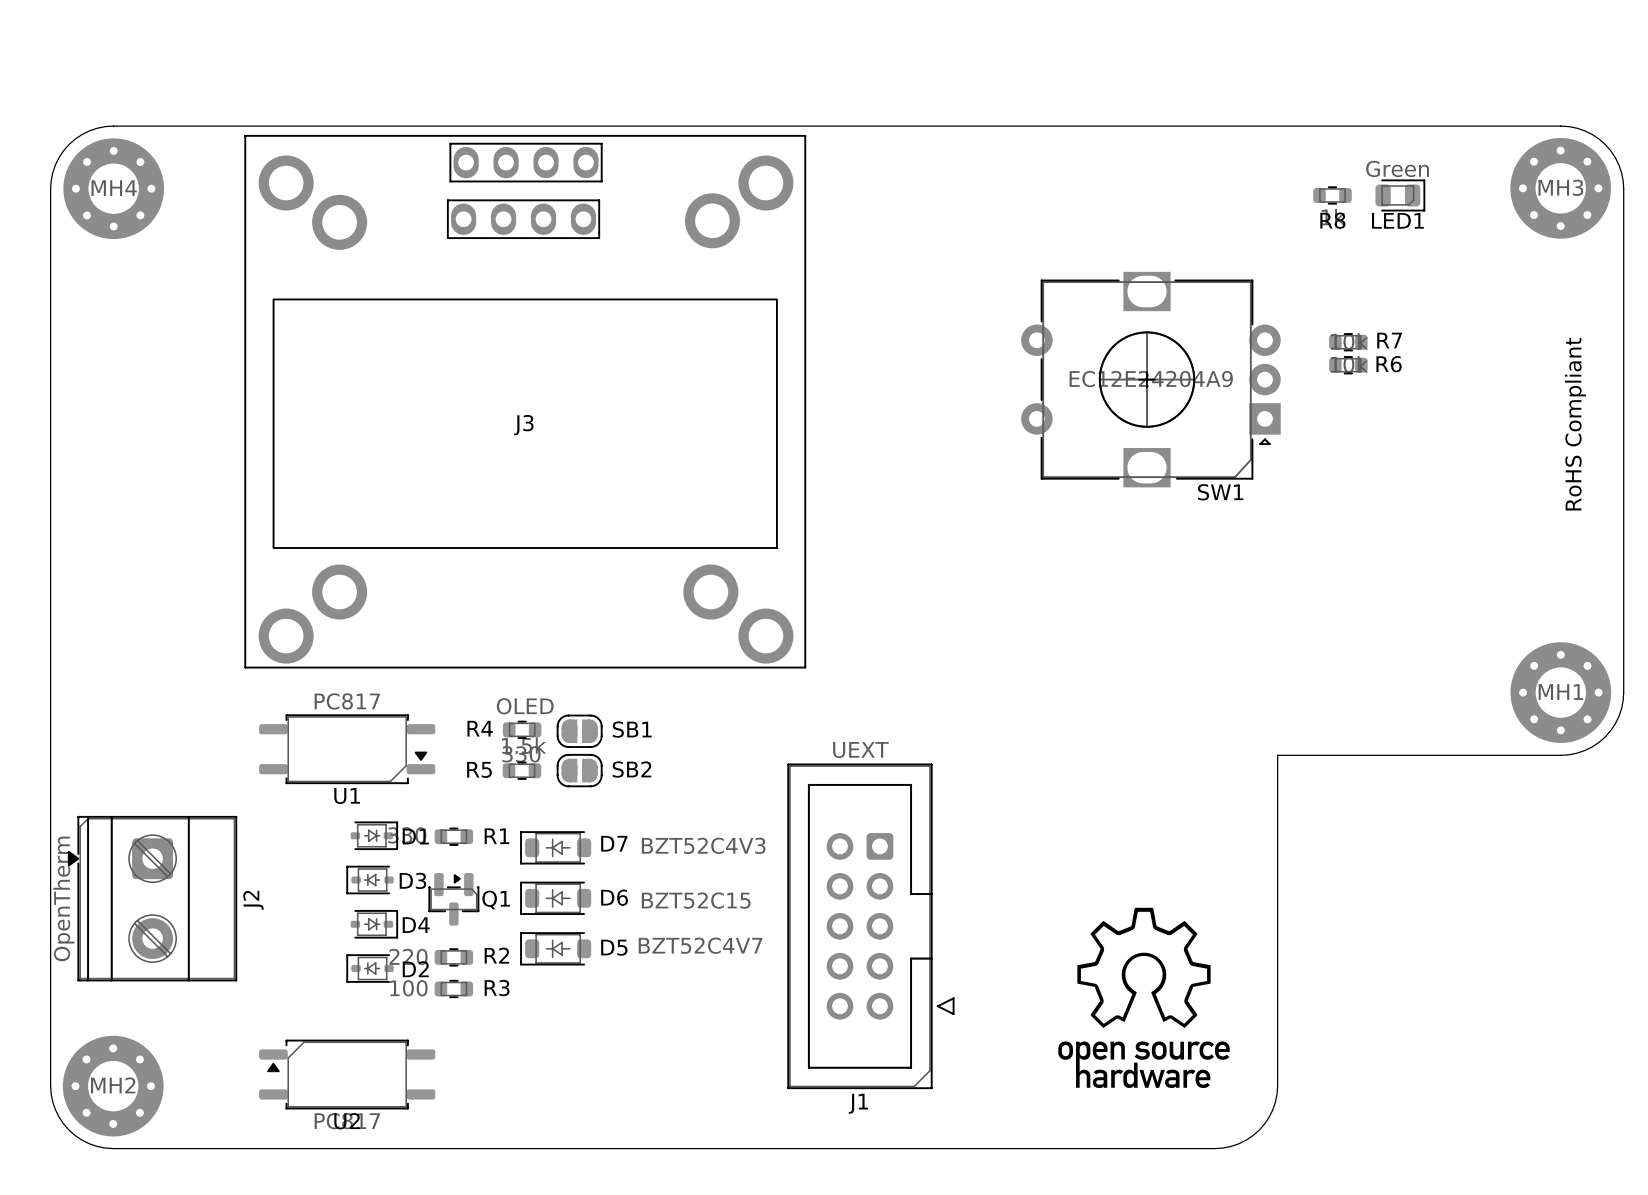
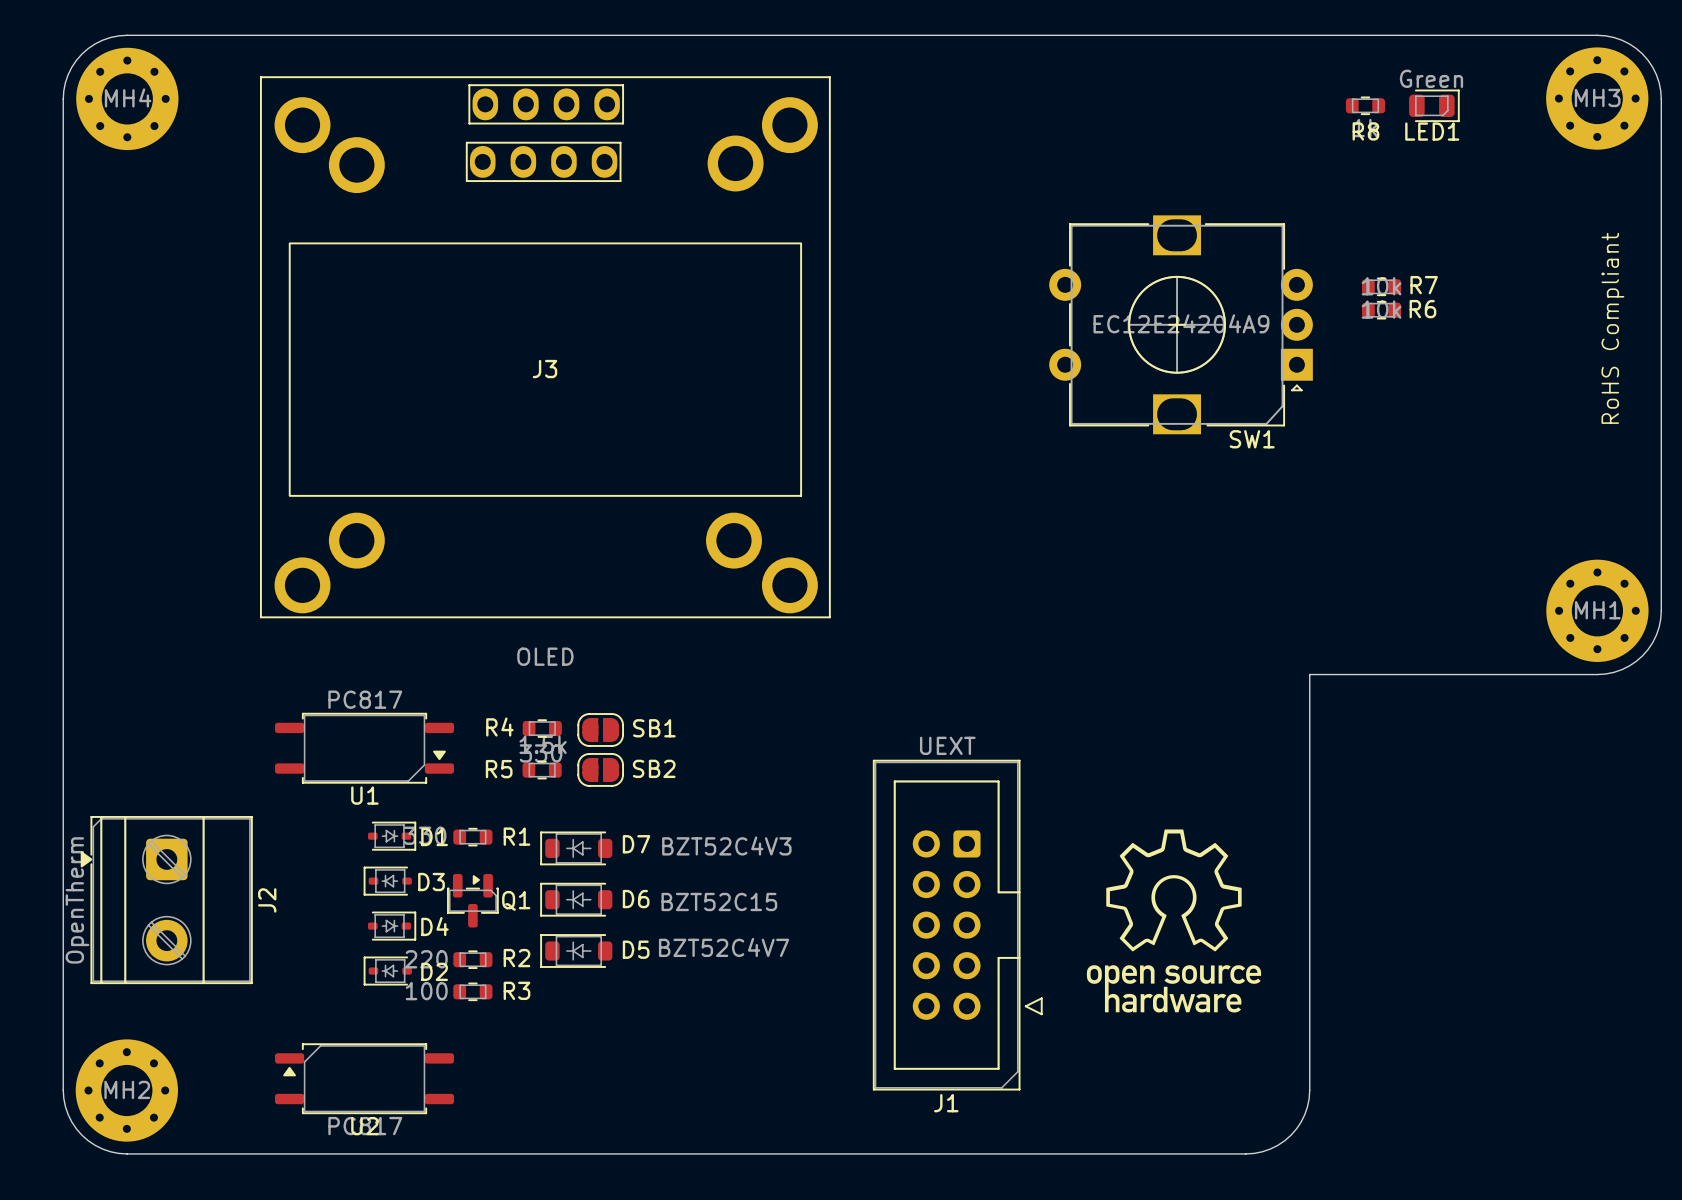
MH4 position: (113, 188) -> (127, 98)
MH3 position: (1560, 188) -> (1597, 98)
board edge: (50, 189) (55, 164) (69, 144) (89, 130) (113, 126) (1560, 126) (1584, 130) (1605, 144) (1618, 164) (1623, 189) -> (63, 179) (63, 99) (68, 74) (76, 60) (88, 48) (102, 40) (127, 35) (1605, 35) (1621, 40) (1636, 48) (1648, 60) (1656, 74) (1661, 99) (1661, 179)
R8 position: (1332, 195) -> (1365, 105)
LED1 position: (1400, 195) -> (1434, 105)
R7 position: (1348, 342) -> (1381, 286)
R6 position: (1348, 365) -> (1381, 310)
SW1 position: (1150, 379) -> (1181, 324)
J3 position: (525, 401) -> (545, 347)
text position: RoHS Compliant (1575, 424) -> RoHS Compliant (1612, 328)
board edge: (1623, 613) (1623, 692) (1621, 708) (1615, 723) (1605, 736) (1584, 750) (1560, 755) (1277, 755) -> (1661, 610) (1656, 635) (1642, 655) (1621, 669) (1605, 673) (1309, 674) (1309, 754)
MH1 position: (1560, 692) -> (1597, 610)
J1 position: (870, 926) -> (957, 925)
drawing: none -> [1086, 965, 1102, 984]
drawing: none -> [1121, 965, 1153, 1013]
drawing: none -> [1181, 965, 1197, 984]
drawing: none -> [1214, 965, 1262, 1013]
drawing position: (1143, 967) -> (1173, 890)
drawing: [1058, 1041, 1073, 1060] -> none
drawing: [1092, 1041, 1124, 1088] -> none
drawing: [1151, 1041, 1167, 1060] -> none
drawing: [1183, 1041, 1230, 1088] -> none
drawing position: (1117, 1050) -> (1147, 974)
drawing position: (1142, 1050) -> (1172, 974)
drawing position: (1176, 1050) -> (1207, 974)
drawing position: (1206, 1050) -> (1237, 974)
drawing position: (1083, 1064) -> (1112, 988)
drawing position: (1130, 1075) -> (1160, 999)
drawing position: (1100, 1078) -> (1129, 1003)
drawing position: (1152, 1078) -> (1182, 1003)
drawing position: (1172, 1078) -> (1202, 1003)

